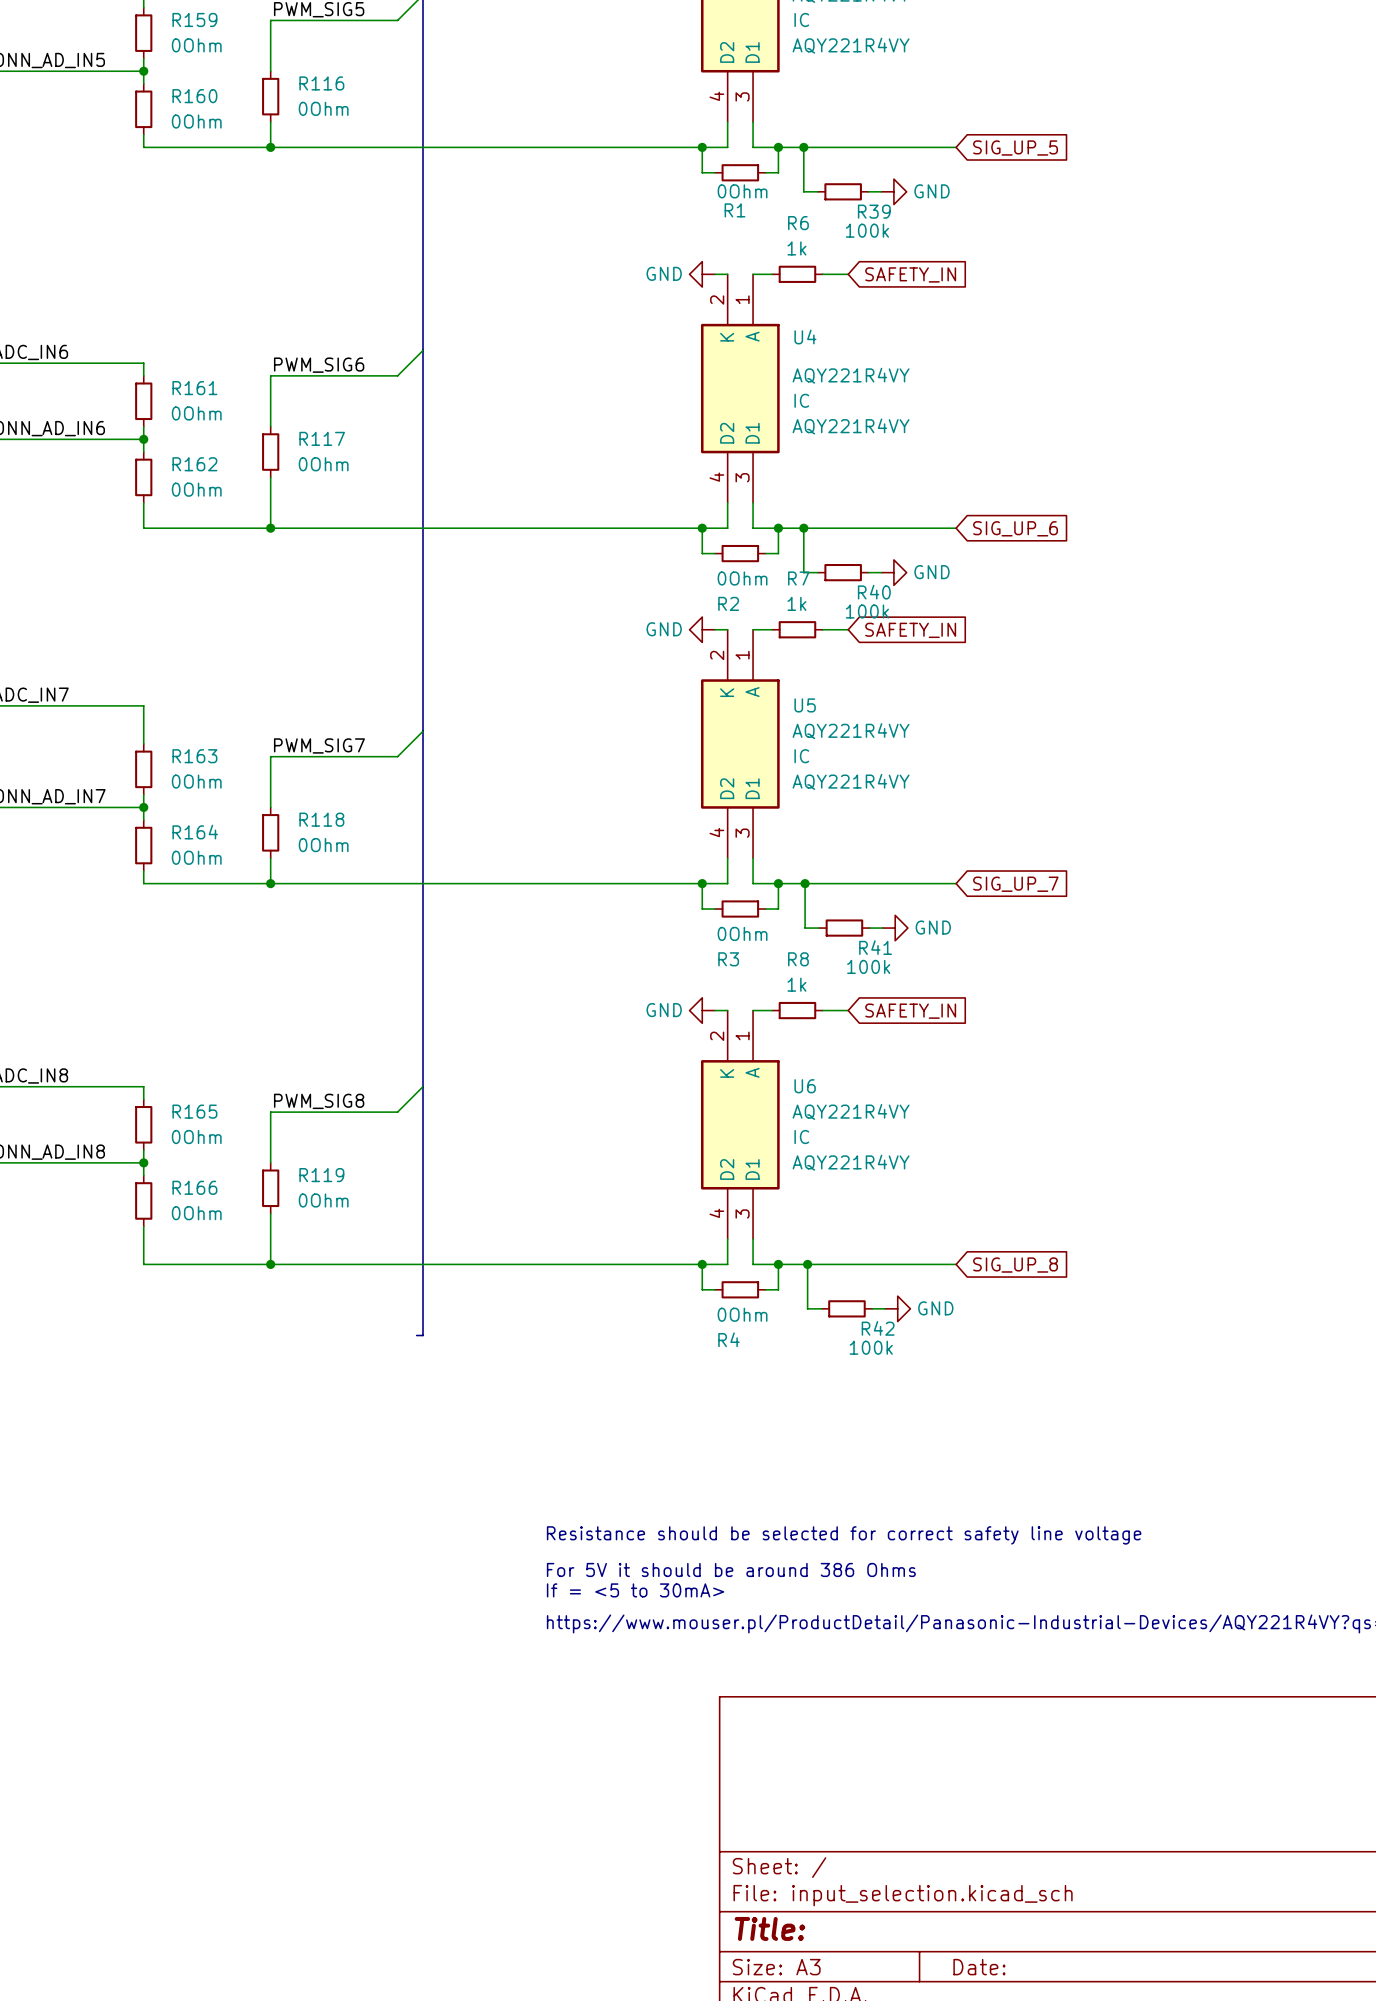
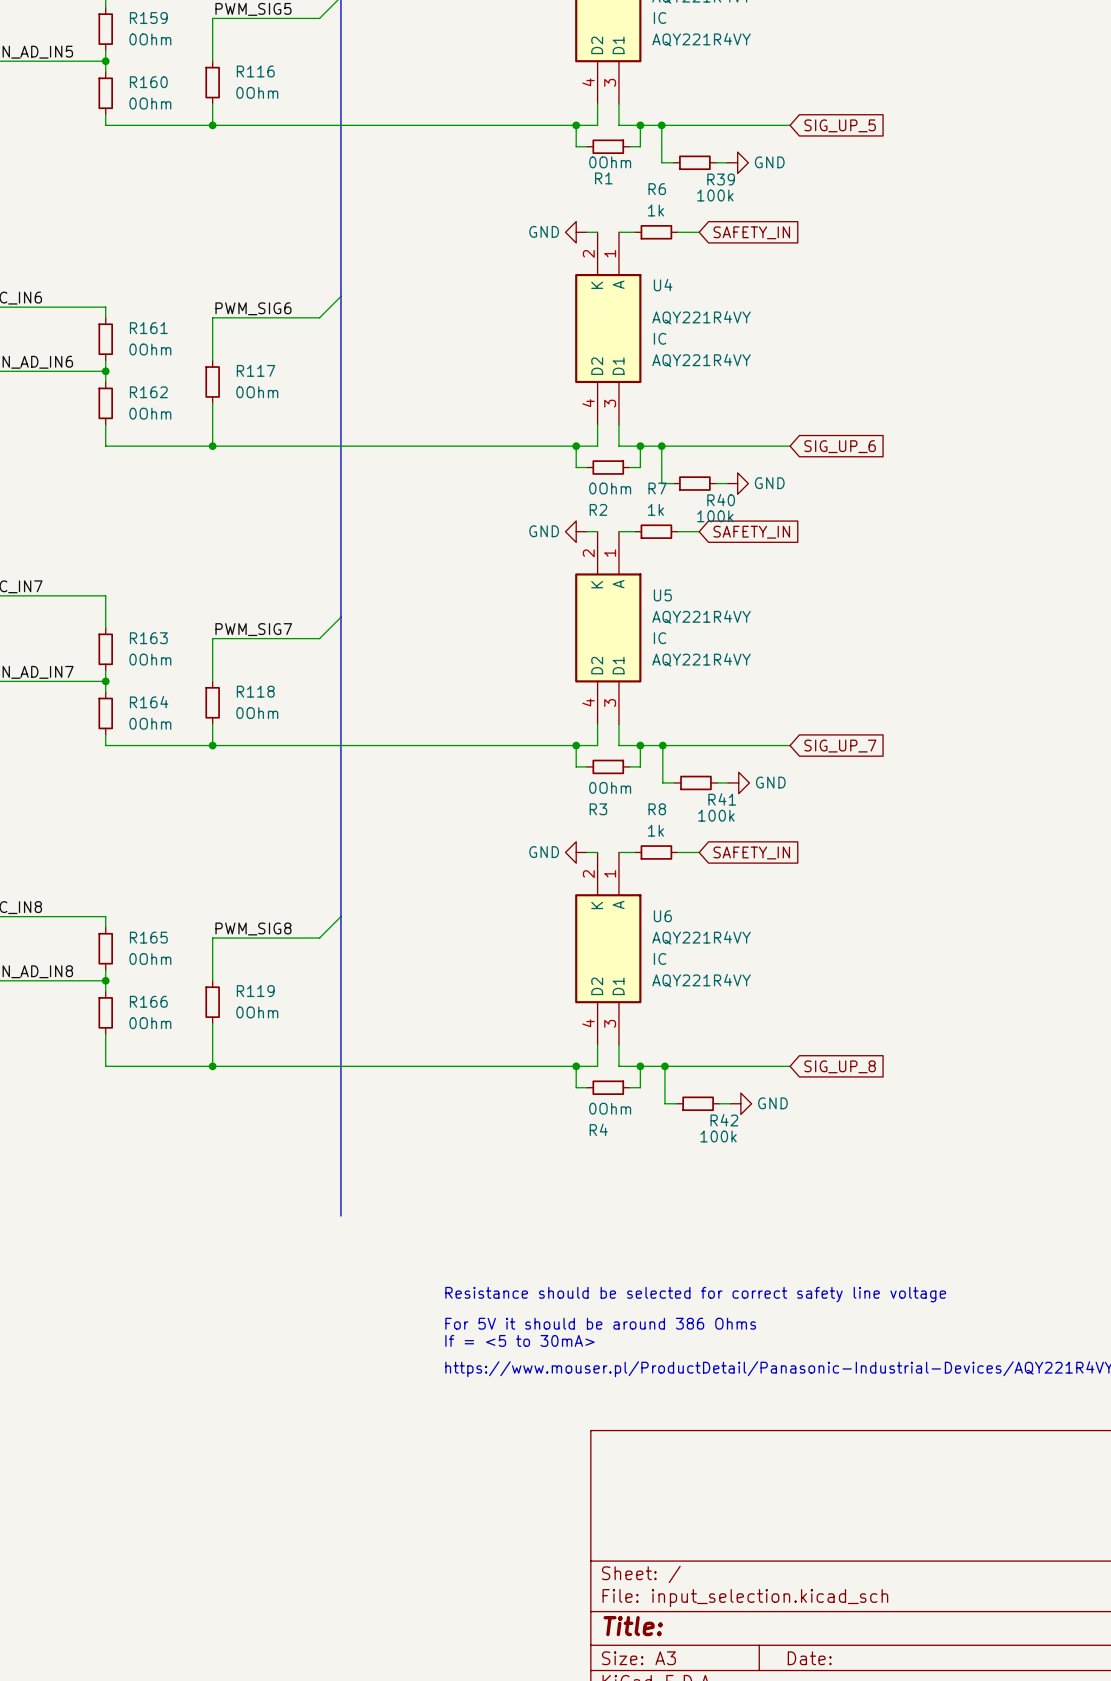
bus: (416, 1335) (423, 1335) -> (340, 1216) (340, 1126)

